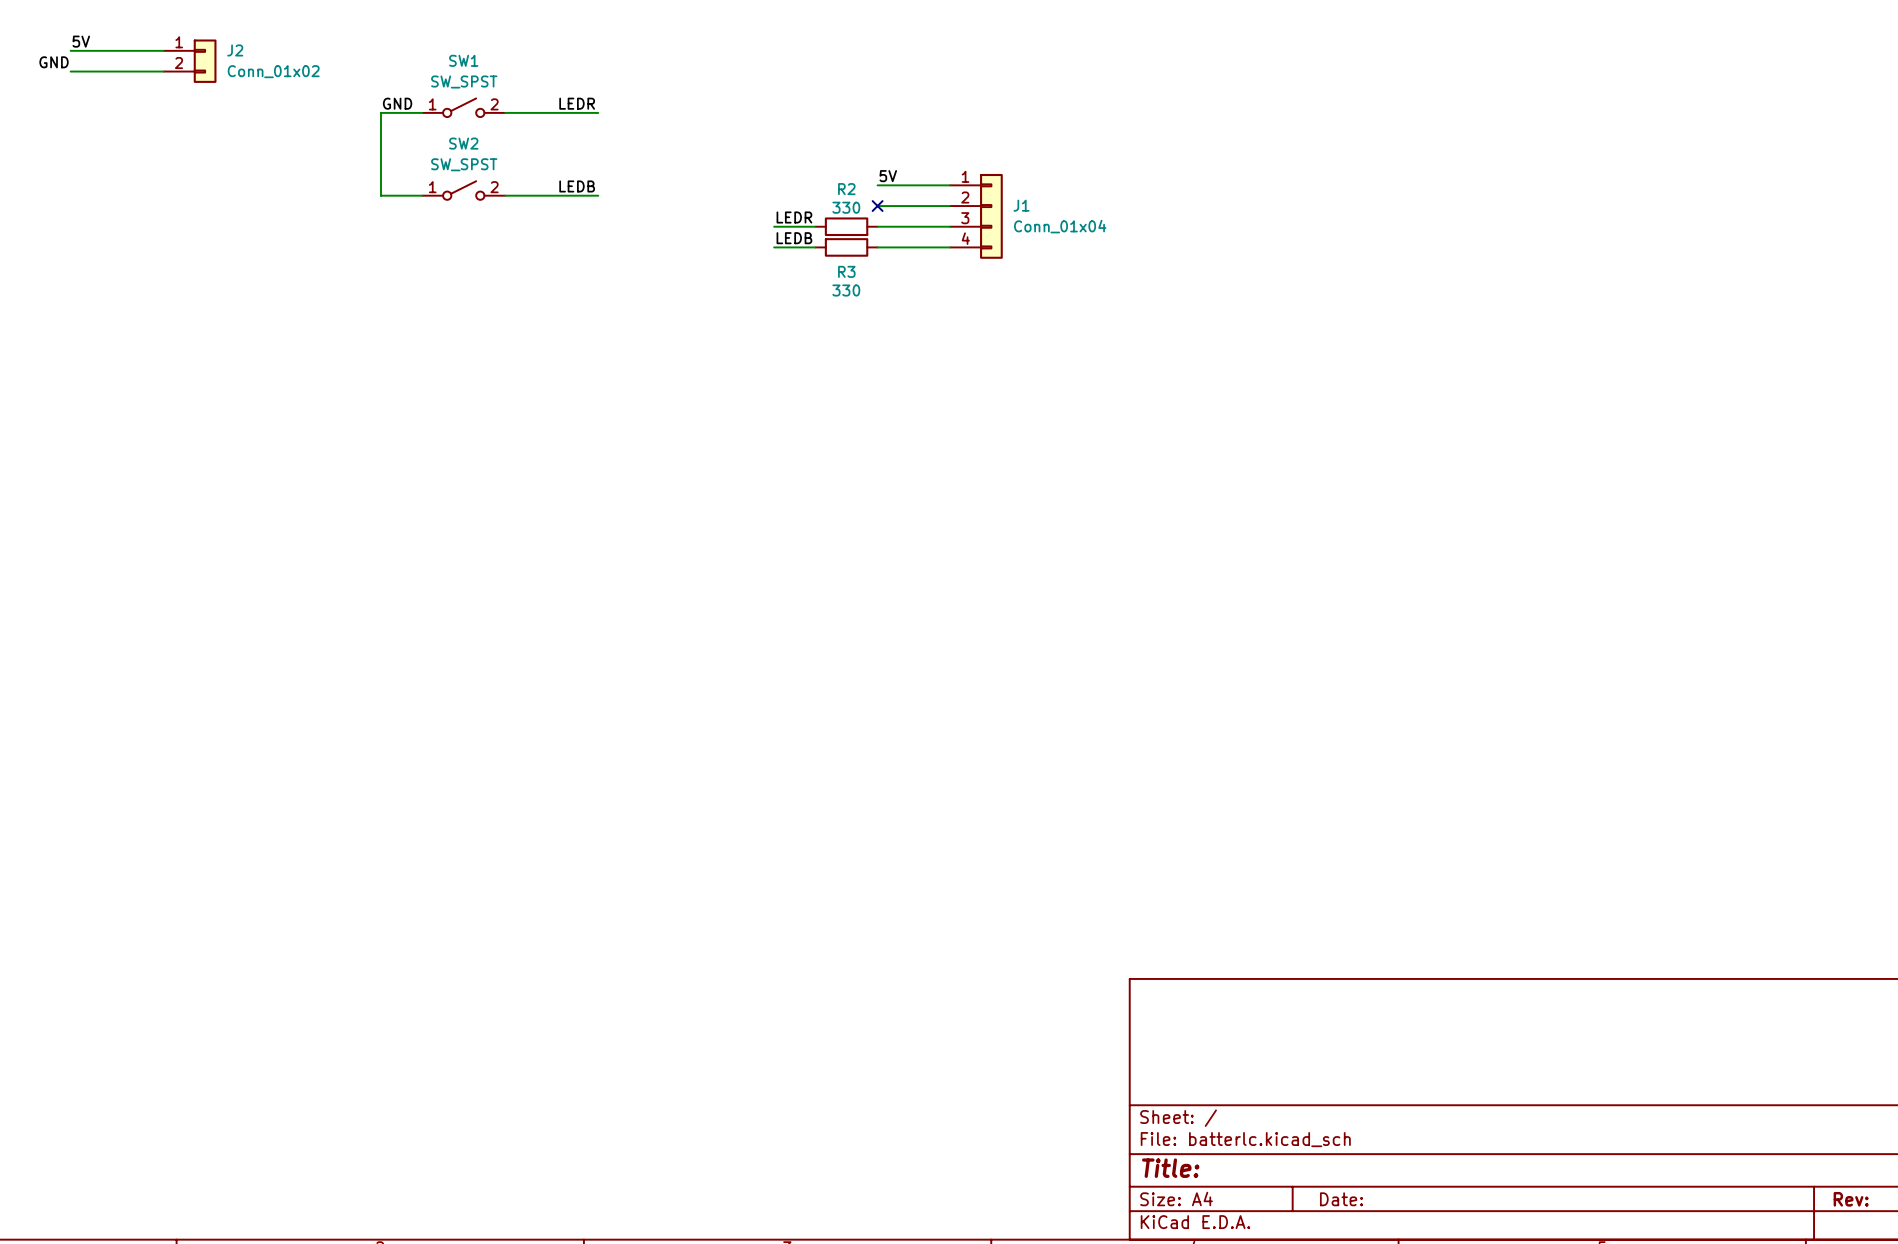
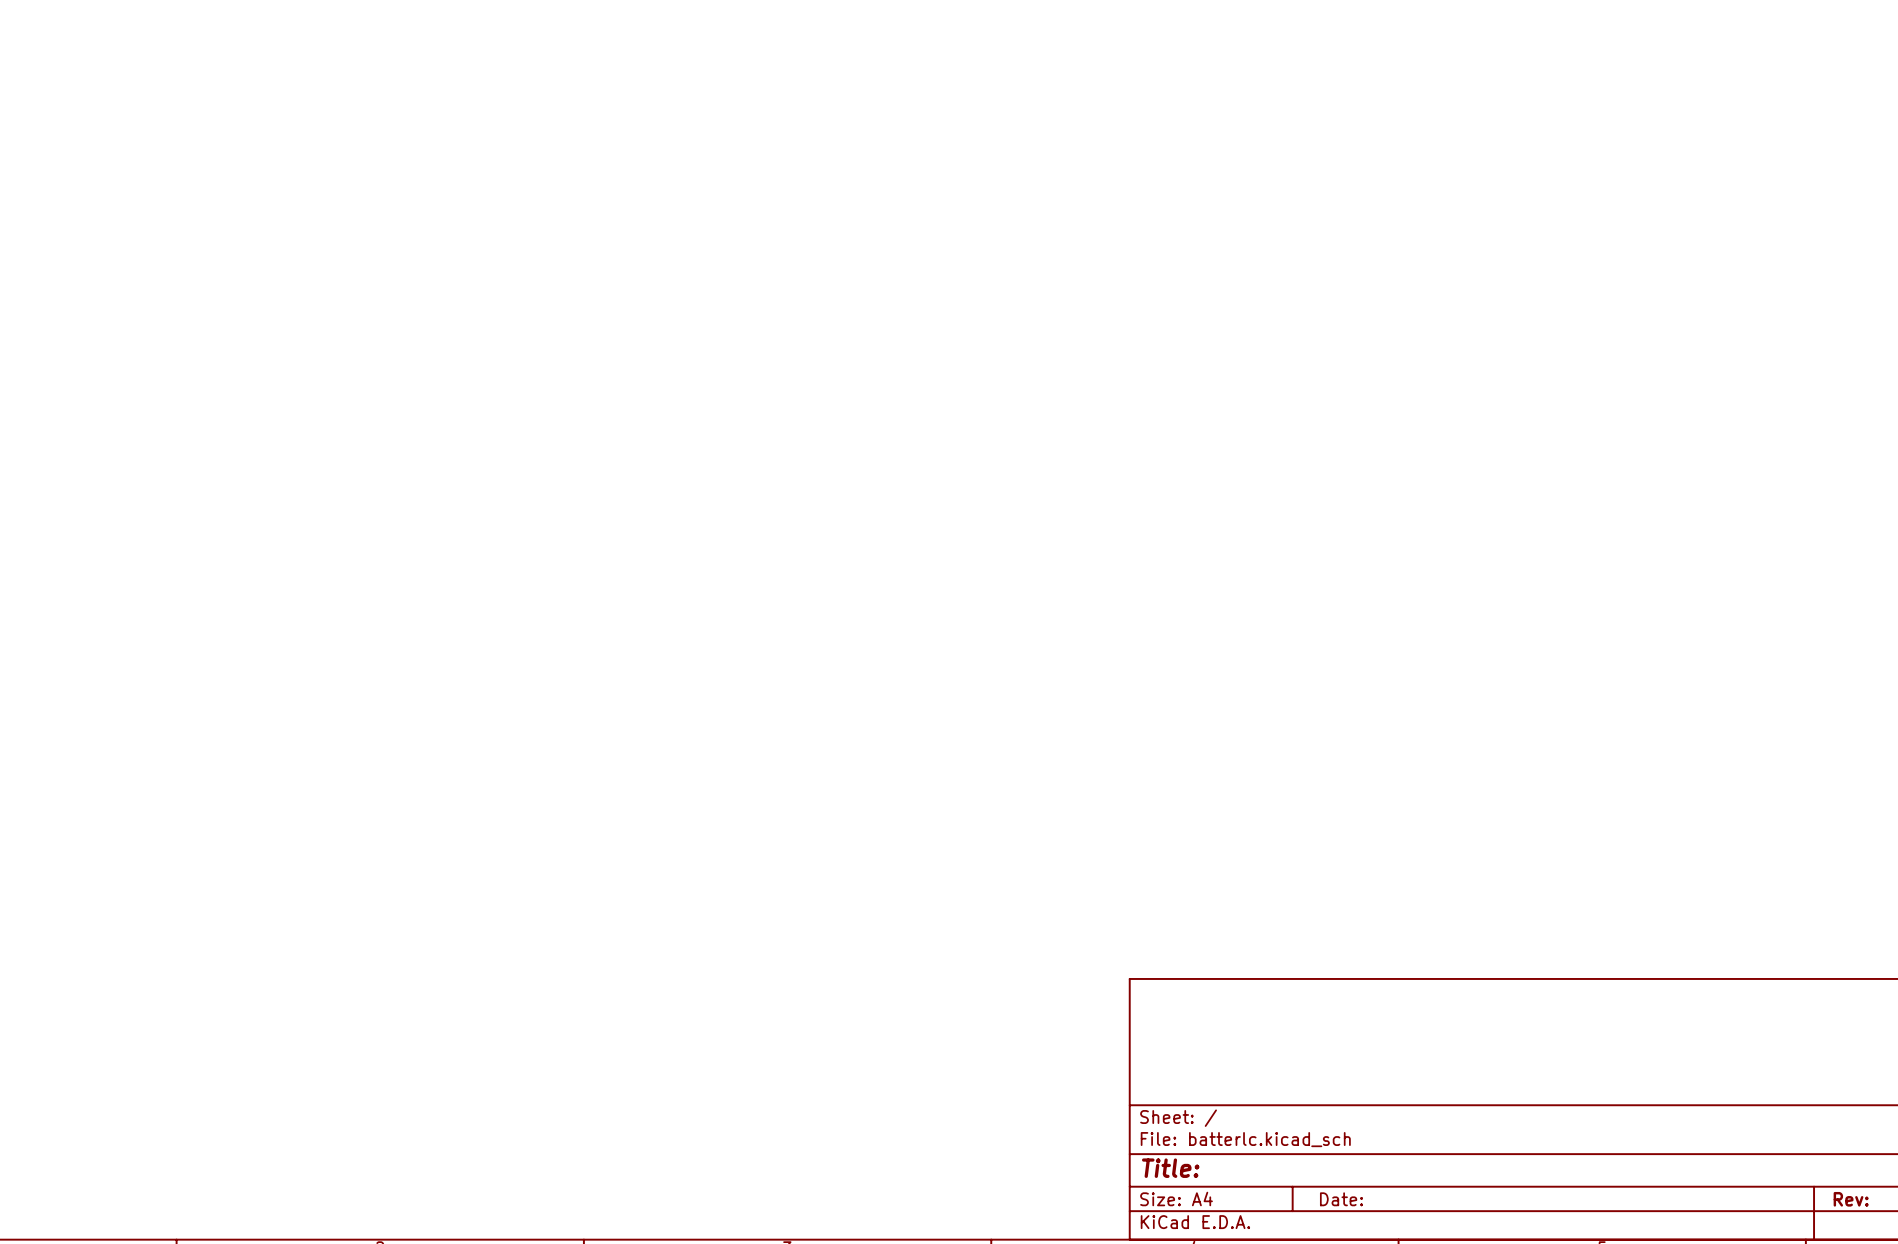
label: 5V (81, 41) -> none
wire: (70, 50) (163, 50) -> none
J2: Conn_01x02 (190, 61) -> none
label: GND (54, 62) -> none
wire: (70, 71) (163, 71) -> none
label: GND (397, 103) -> none
label: LEDR (577, 103) -> none
SW1: SW_SPST (463, 107) -> none
wire: (422, 112) (380, 112) (380, 195) (422, 195) -> none
wire: (505, 112) (598, 112) -> none
label: 5V (888, 176) -> none
wire: (877, 185) (950, 185) -> none
label: LEDB (577, 186) -> none
SW2: SW_SPST (463, 190) -> none
wire: (505, 195) (598, 195) -> none
wire: (877, 206) (950, 206) -> none
no-connect mark: (877, 206) -> none
J1: Conn_01x04 (976, 216) -> none
label: LEDR (794, 217) -> none
wire: (774, 226) (815, 226) -> none
R2: 330 (846, 226) -> none
wire: (877, 226) (950, 226) -> none
label: LEDB (794, 238) -> none
wire: (774, 247) (815, 247) -> none
R3: 330 (846, 247) -> none
wire: (877, 247) (950, 247) -> none

